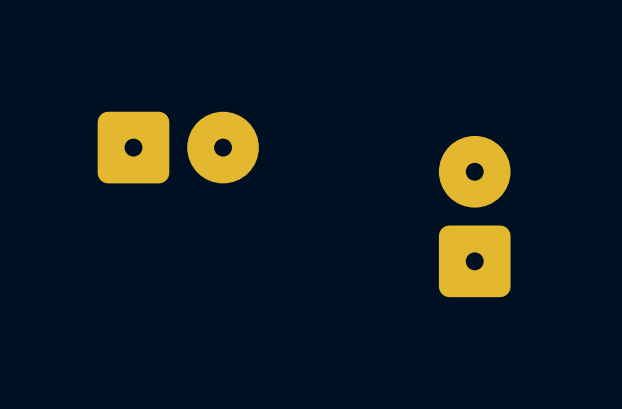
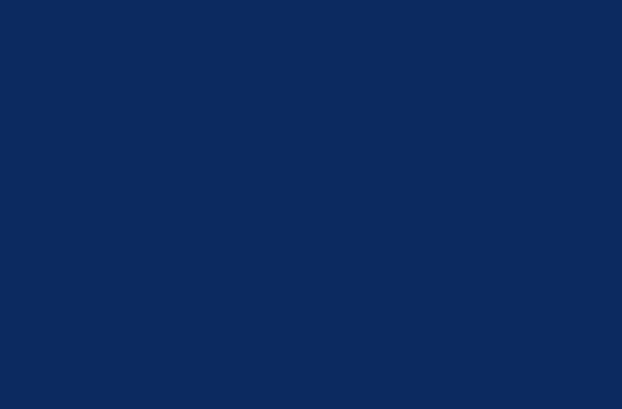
part: (178, 147) -> none
part: (474, 216) -> none

